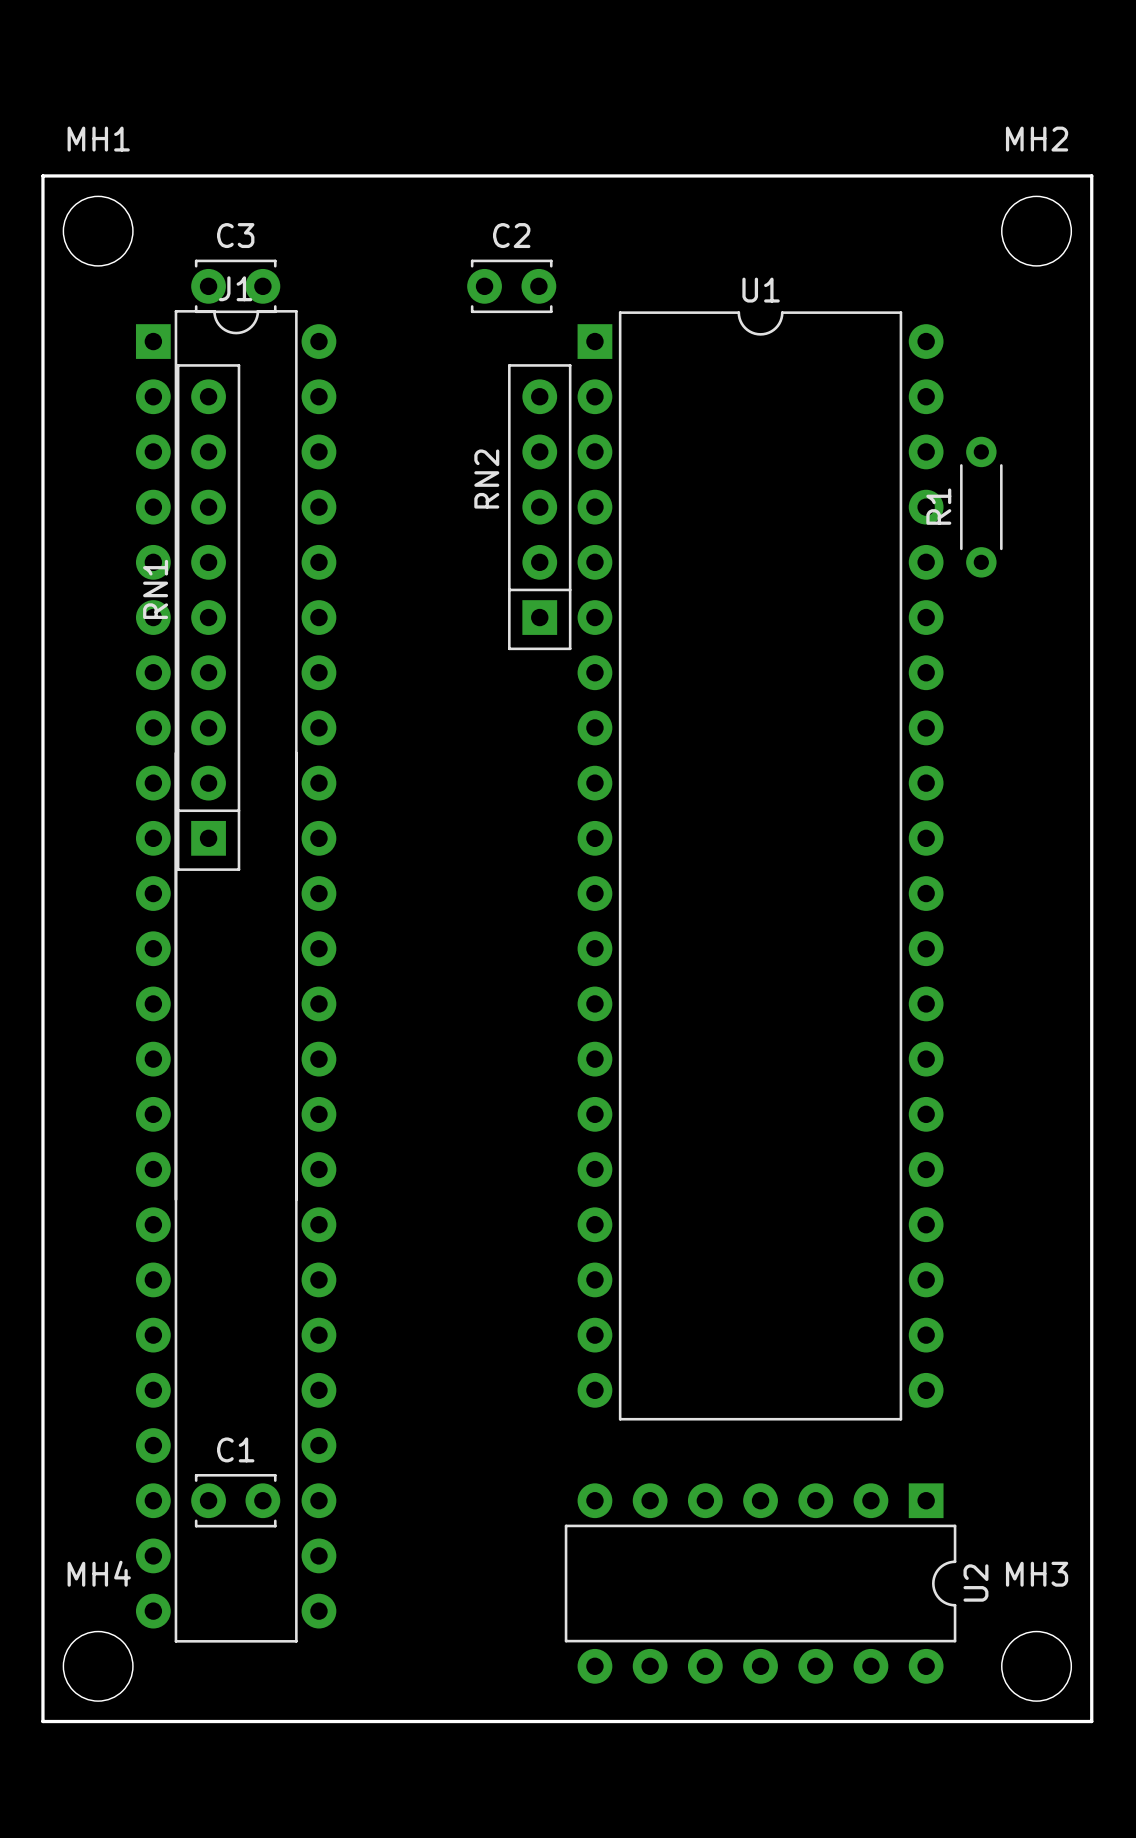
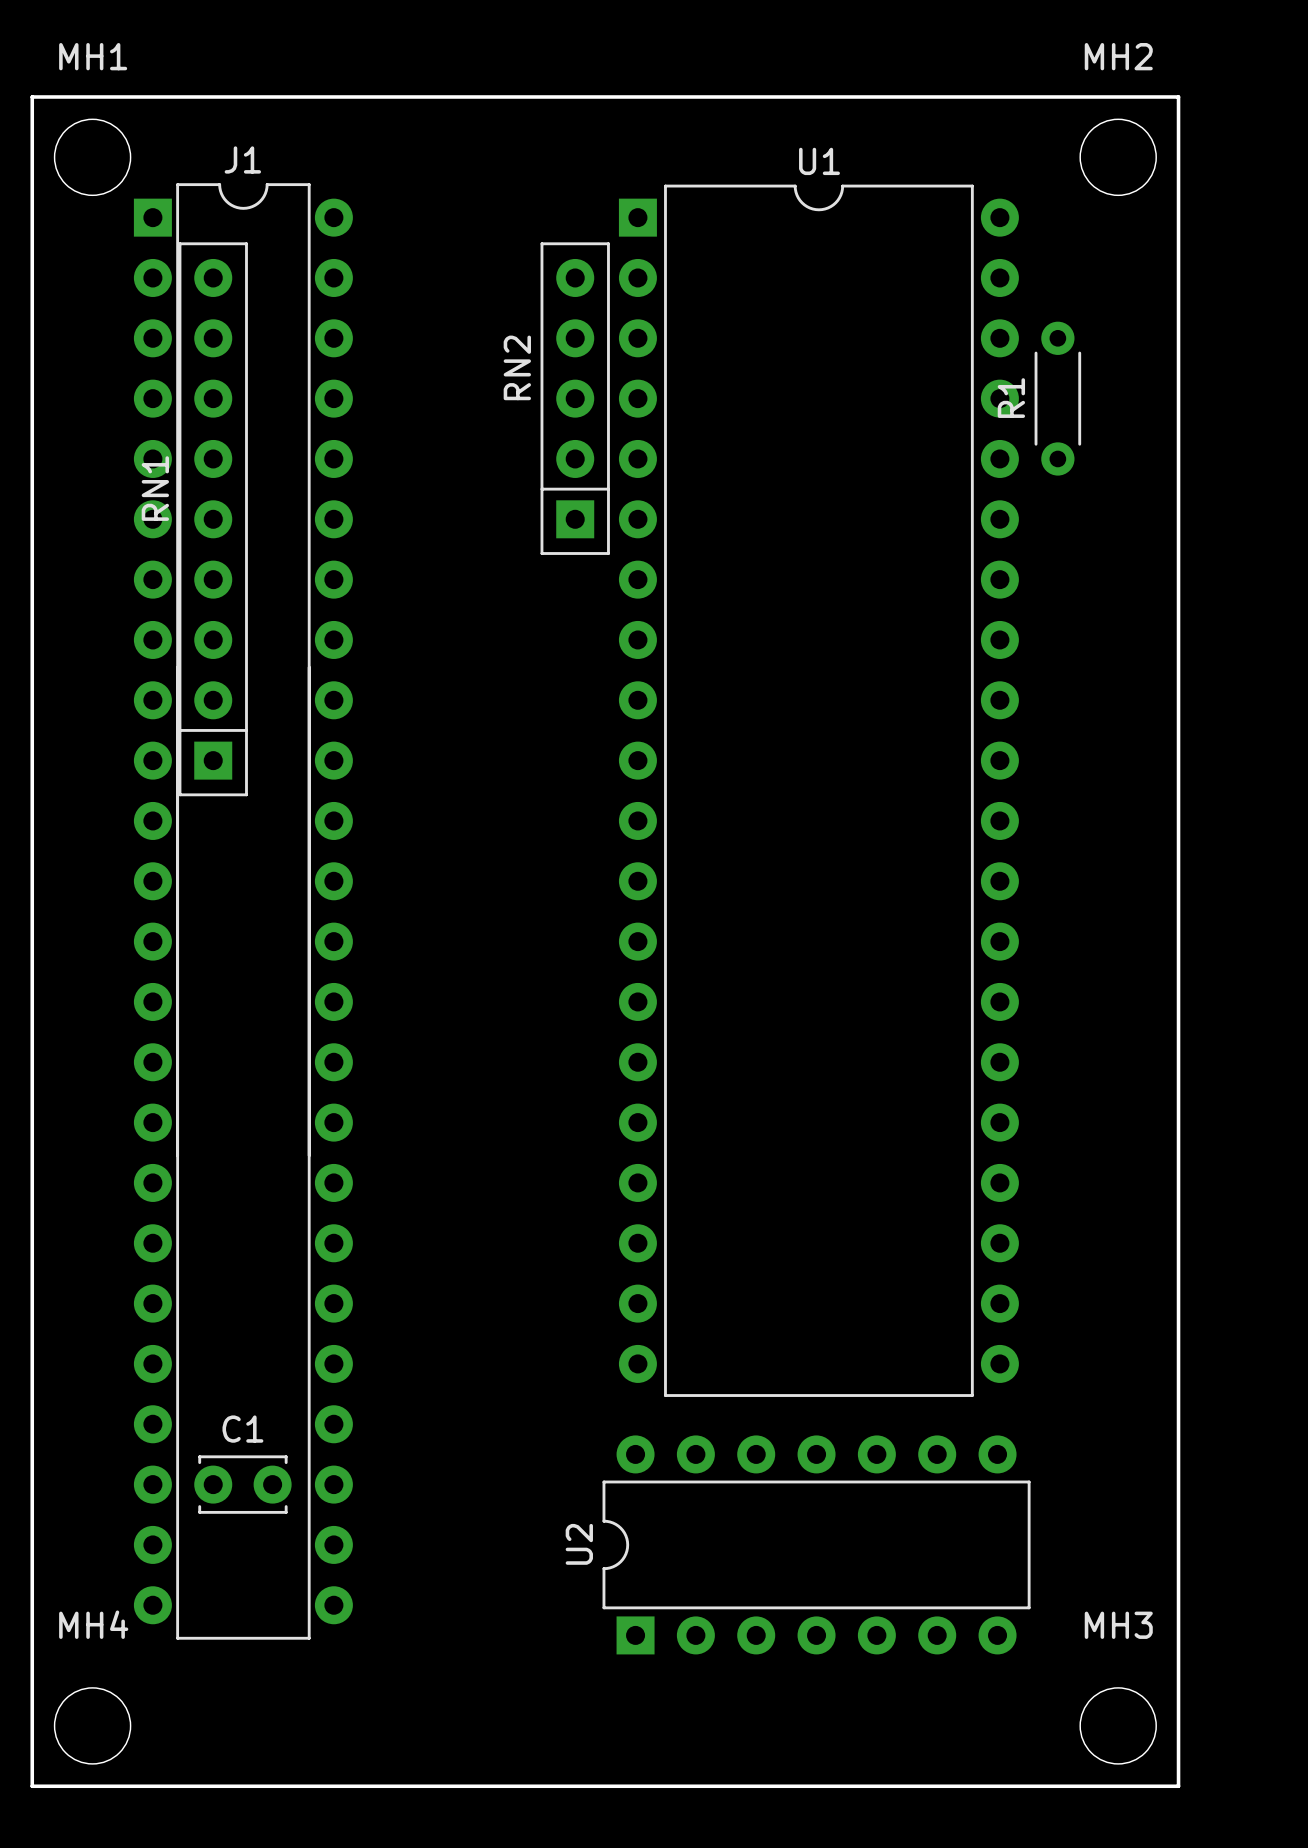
C3: (235, 286) -> none
C2: (511, 286) -> none
RN2 position: (539, 507) -> (575, 398)
R1 position: (981, 507) -> (1057, 398)
RN1 position: (208, 617) -> (213, 519)
U1 position: (760, 865) -> (818, 790)
J1 position: (236, 976) -> (243, 911)
C1 position: (235, 1500) -> (242, 1484)
U2 rotation: 0° (760, 1583) -> 180° (816, 1544)

